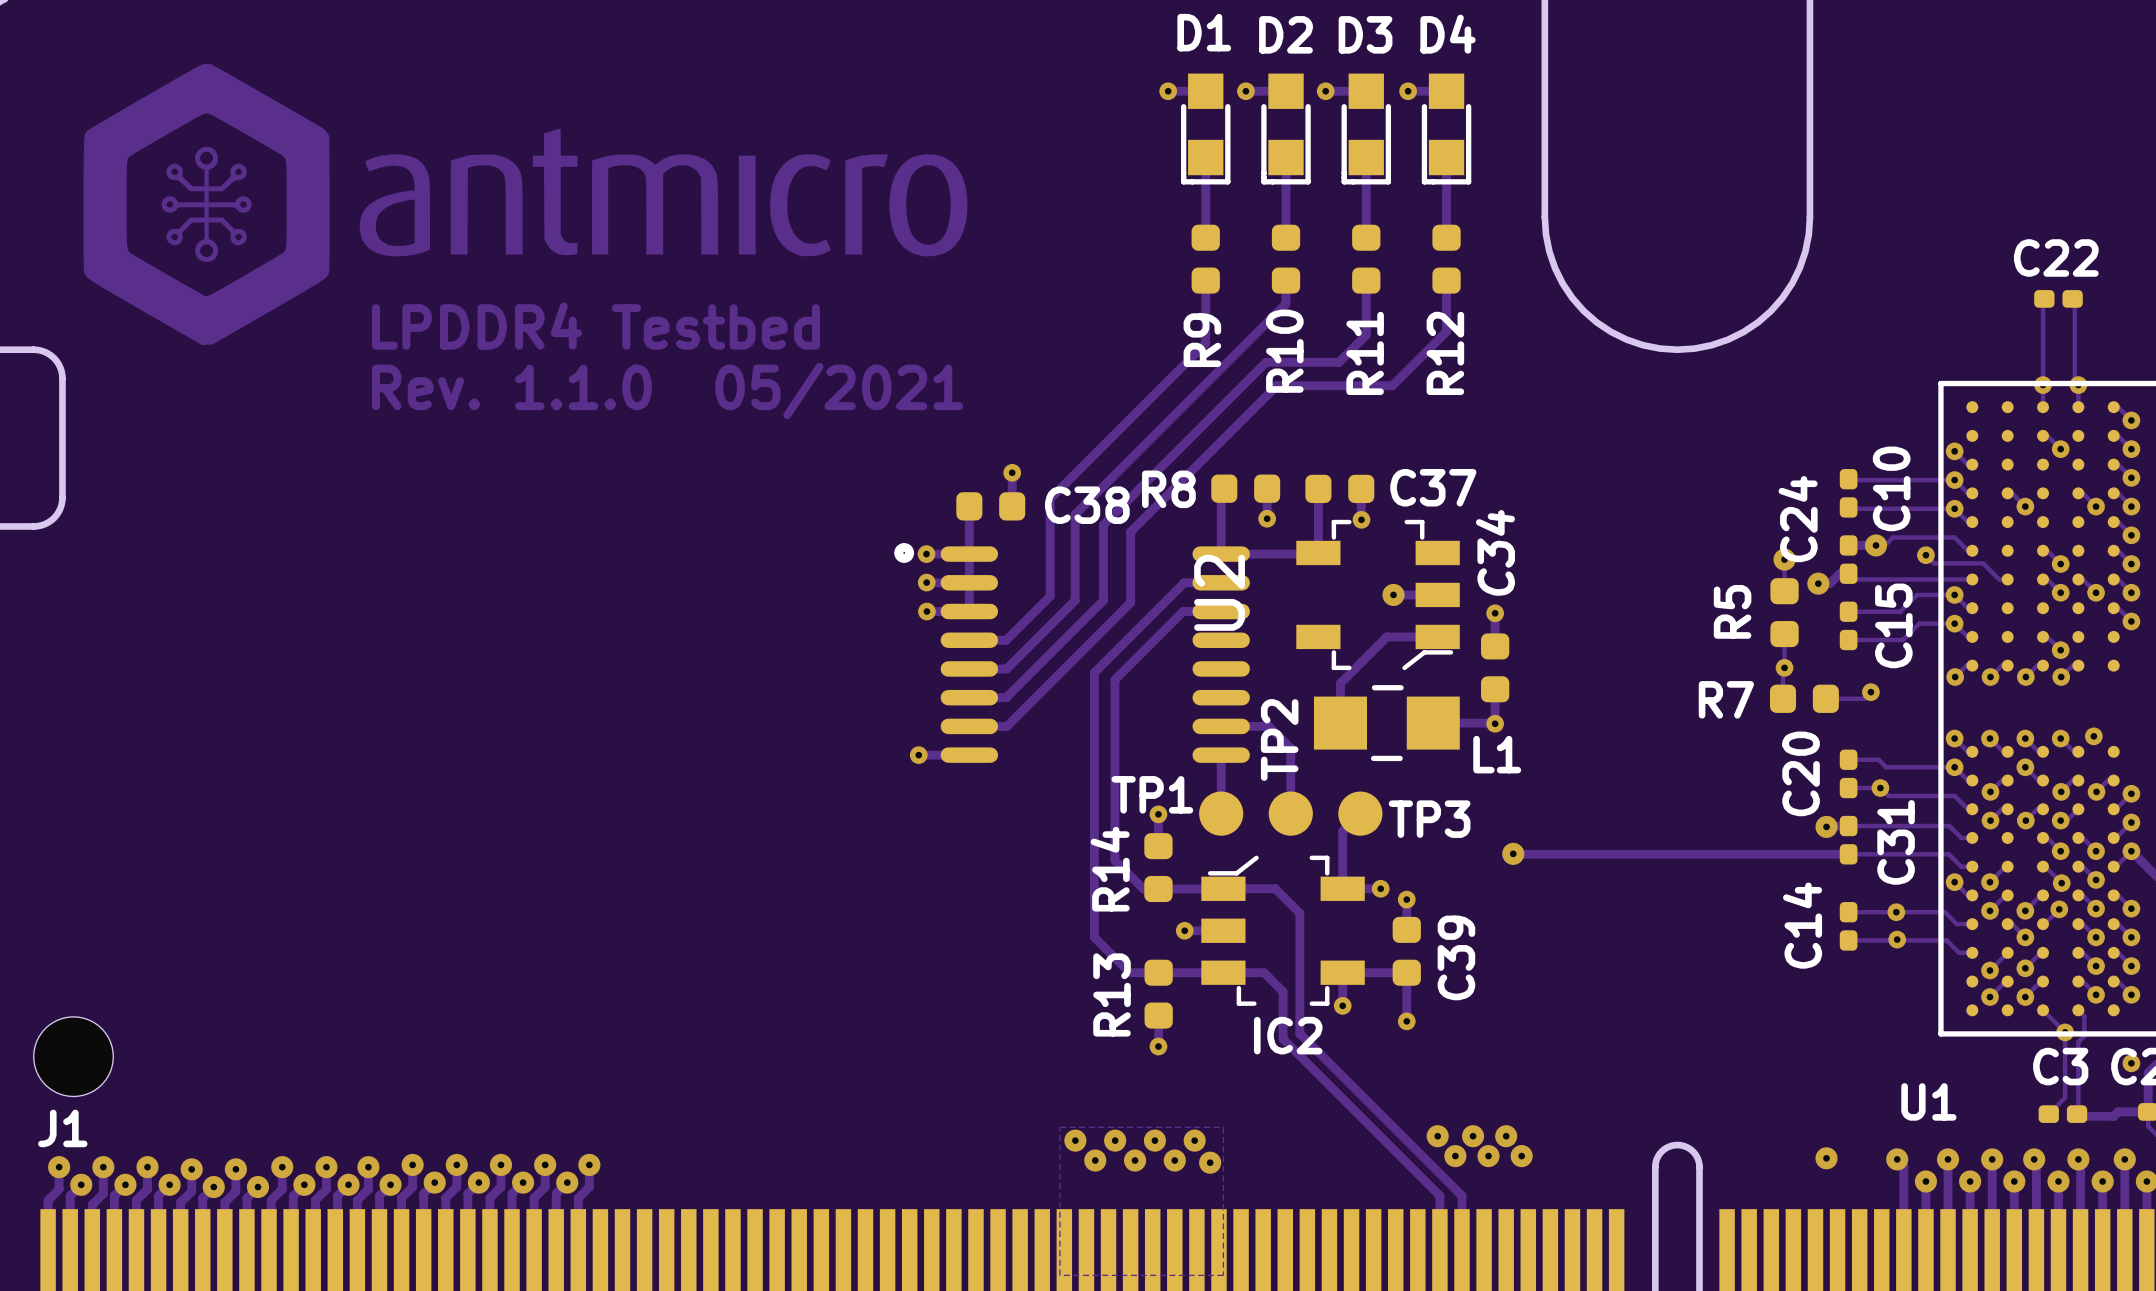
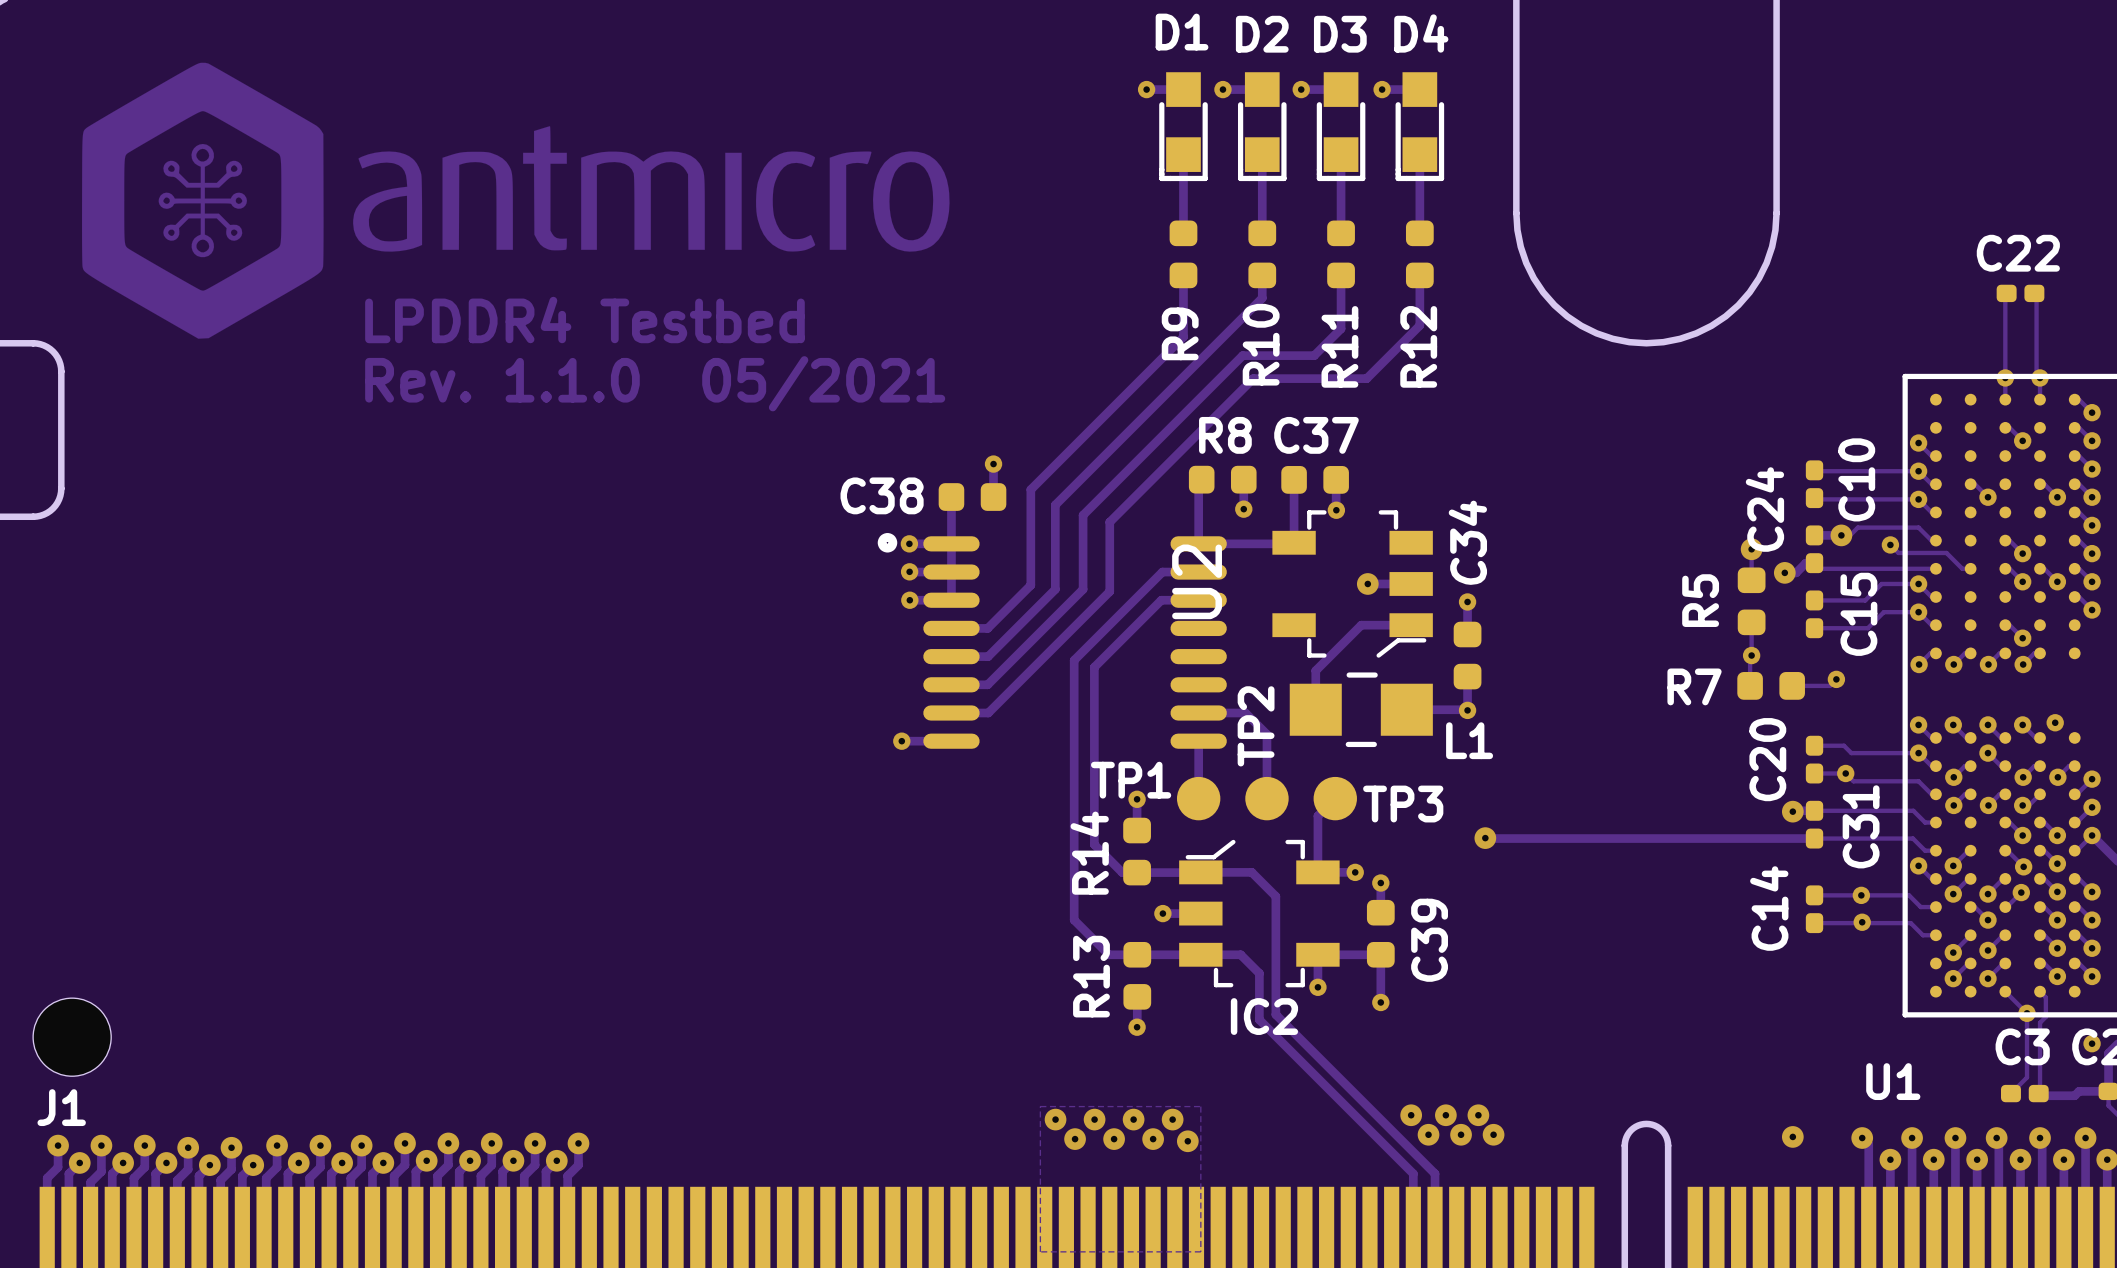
C37 name position: C37 (1433, 487) -> C37 (1316, 435)
R8 name position: R8 (1168, 489) -> R8 (1225, 435)
C38 name position: C38 (1087, 505) -> C38 (882, 495)

